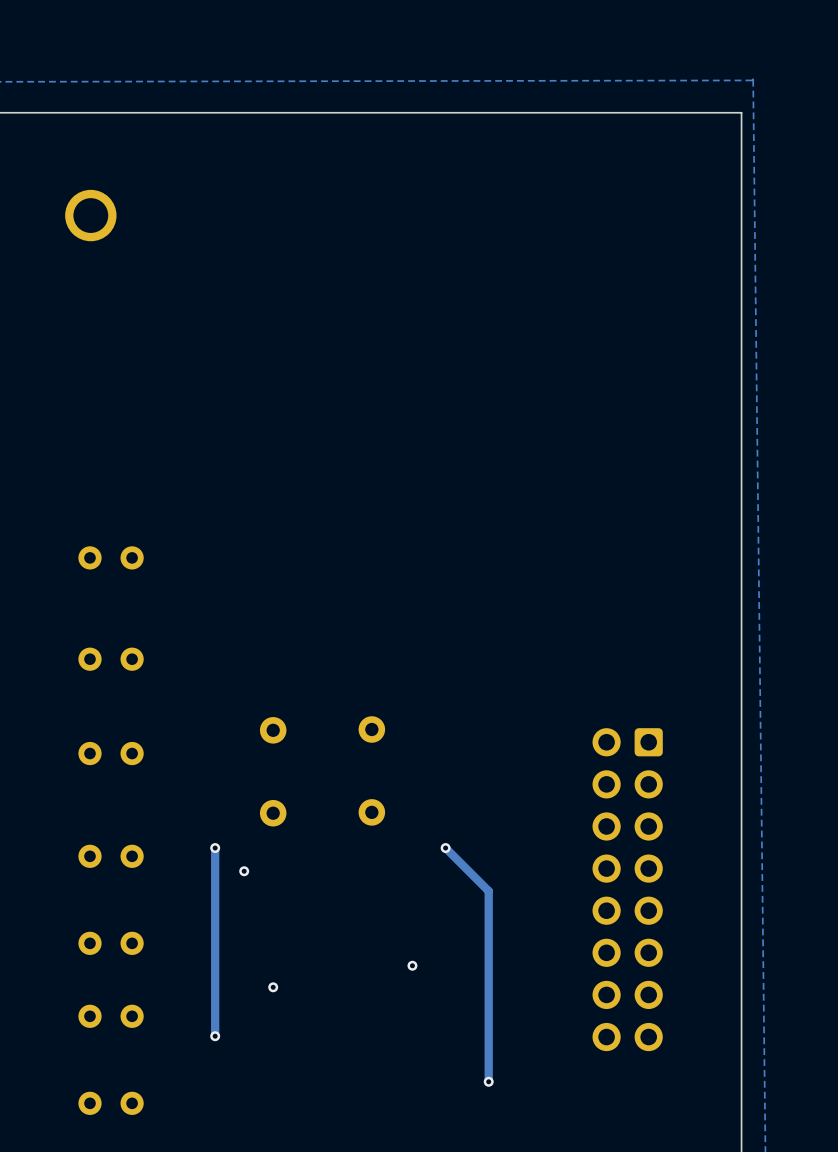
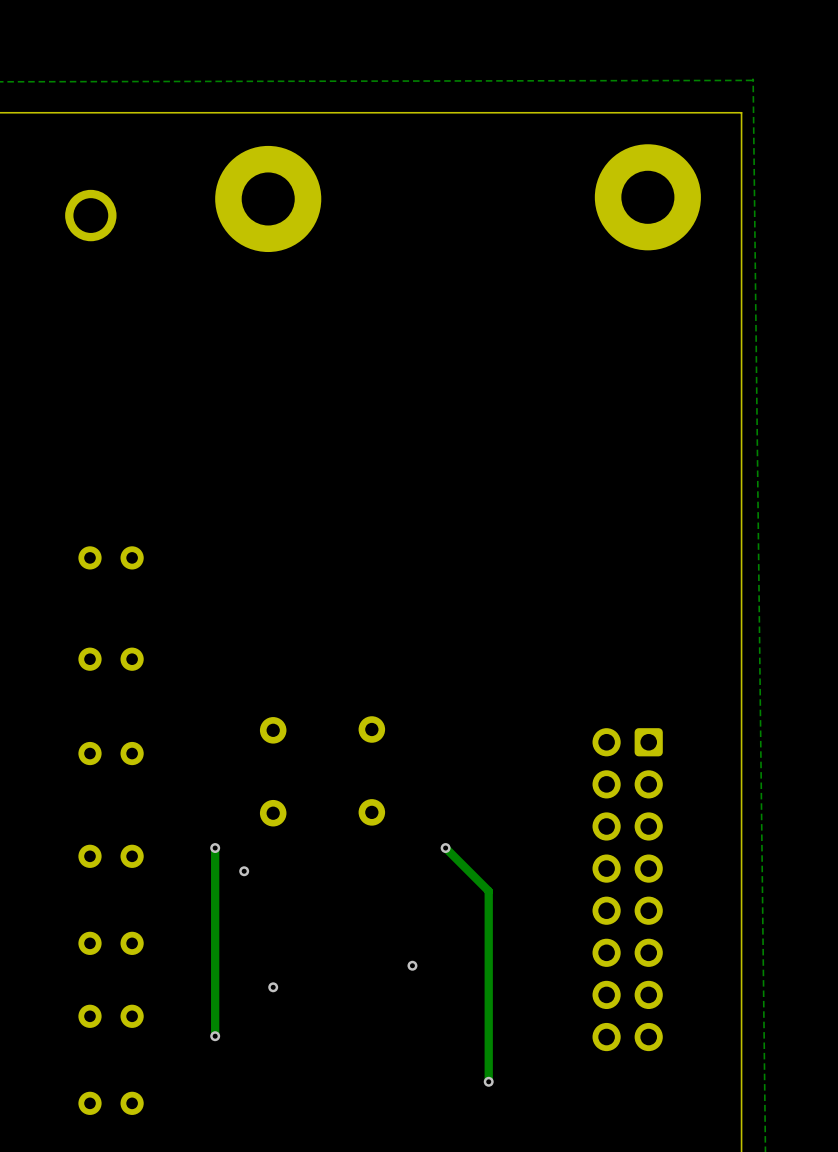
part: none -> (647, 197)
part: none -> (268, 198)

